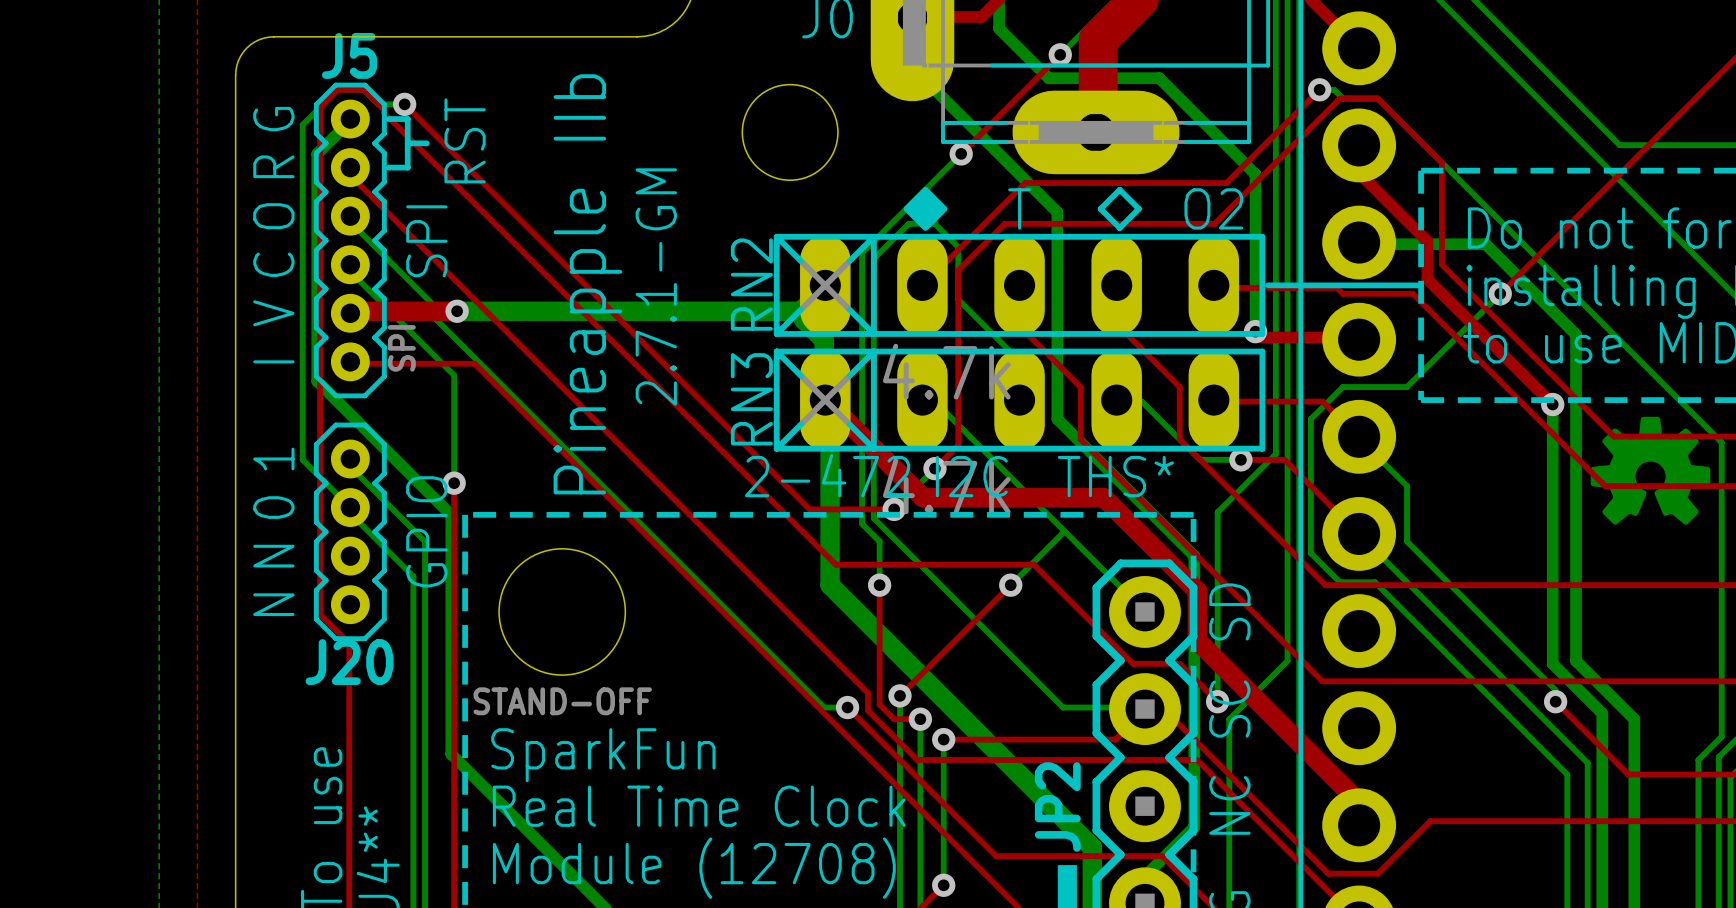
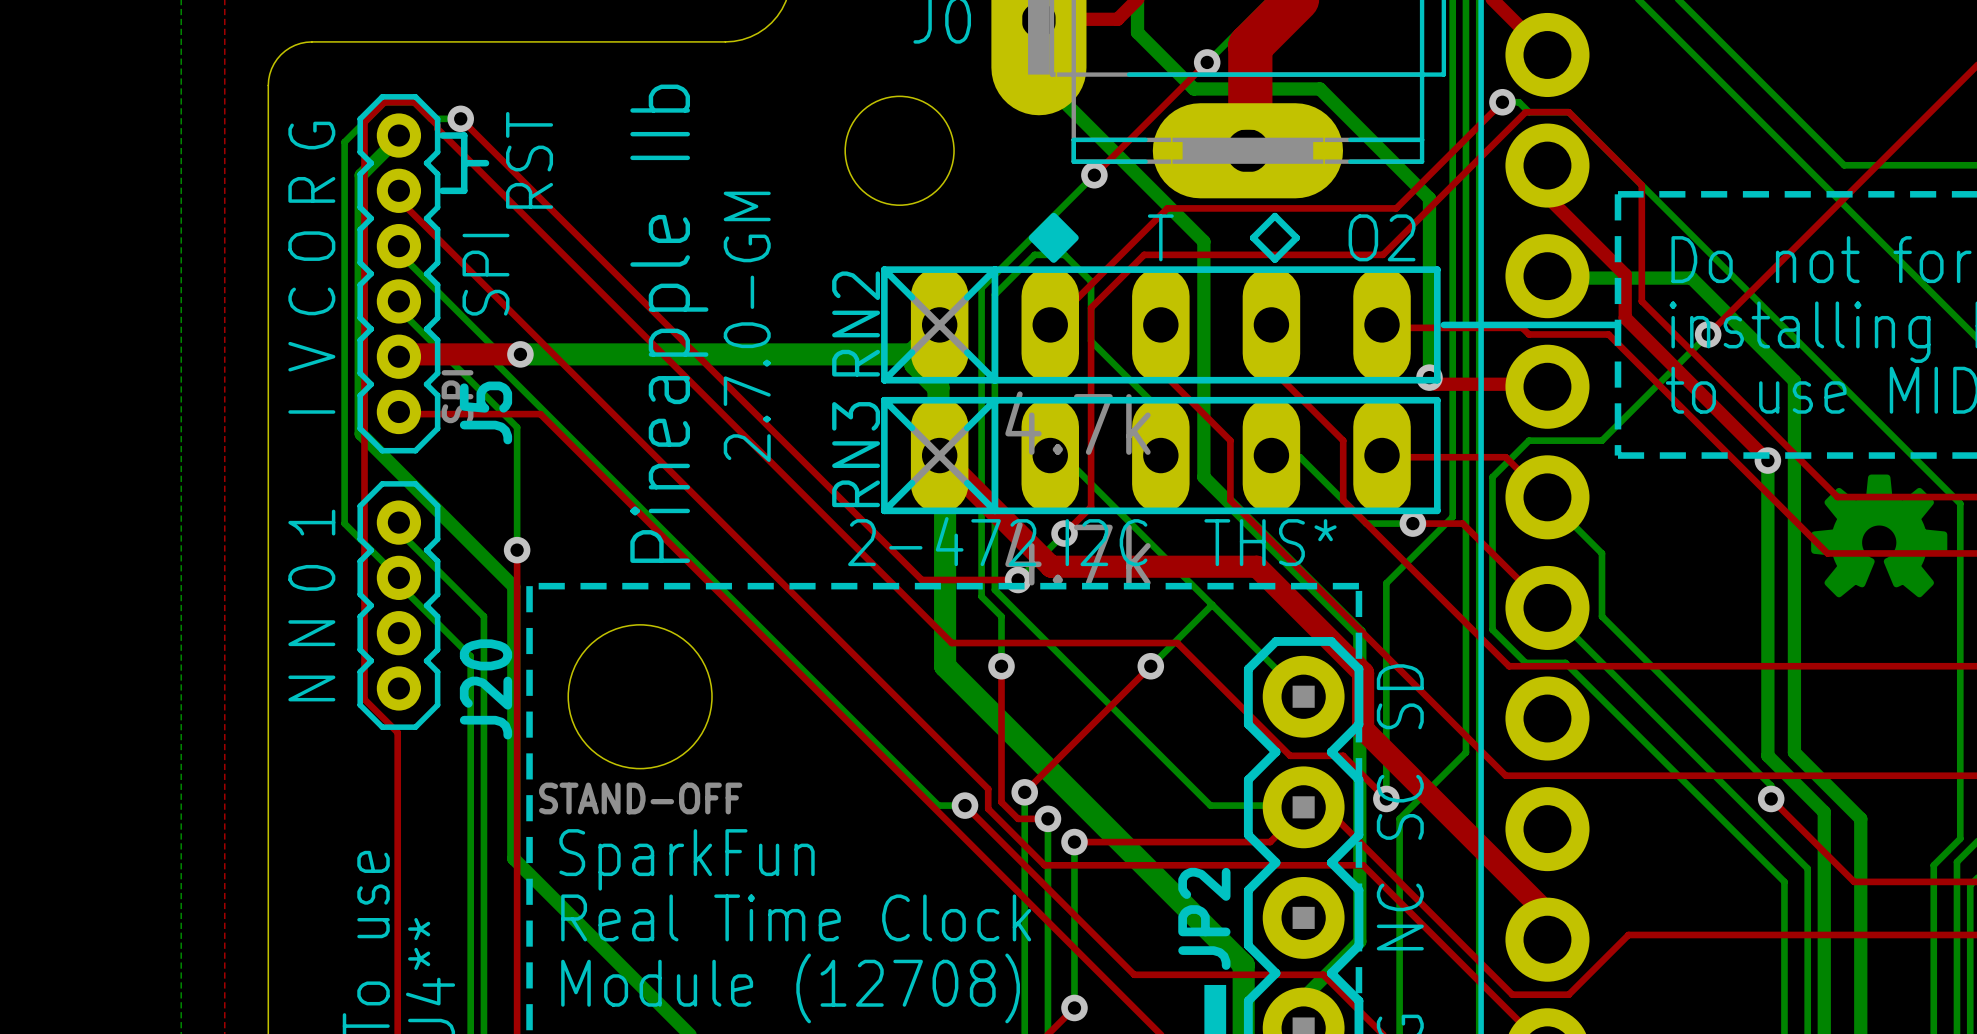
J5 name rotation: 0° (349, 55) -> 90° counterclockwise (485, 412)
J5 name position: J5 (349, 55) -> J5 (485, 412)
text: 2.7.1-GM (656, 287) -> 2.7.0-GM (747, 326)
text: GPIO (426, 531) -> none
J20 name rotation: 0° (349, 662) -> 90° counterclockwise (485, 689)

